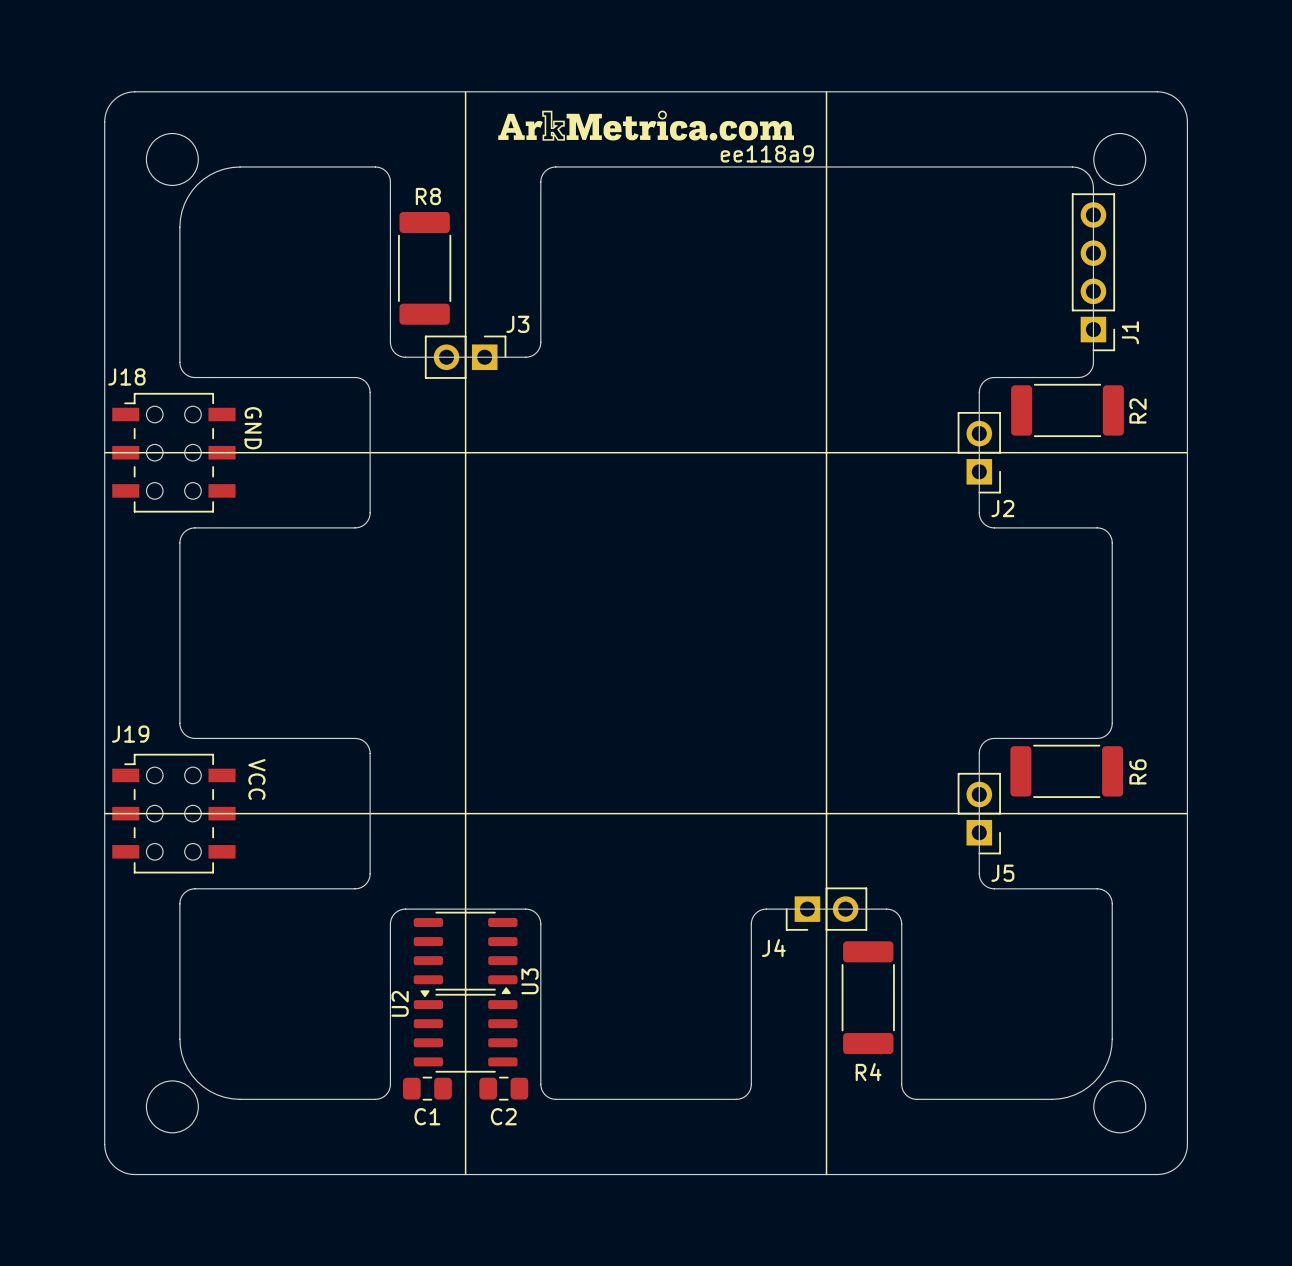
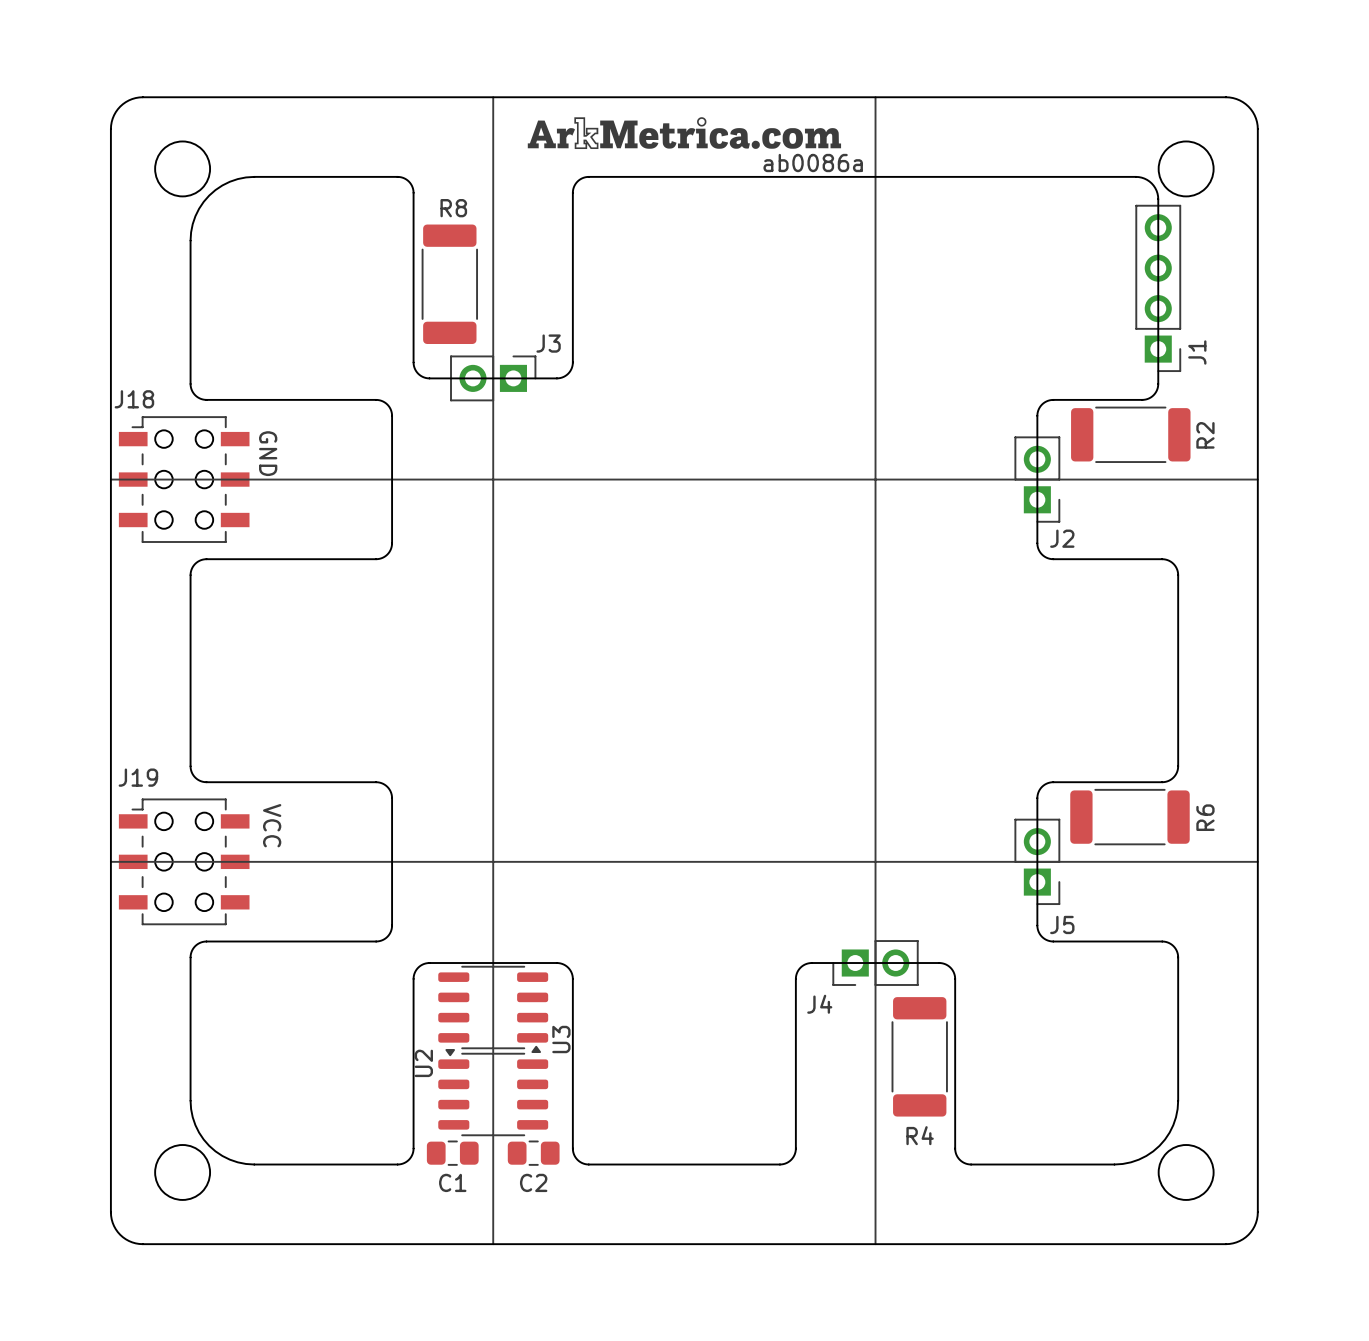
text: ee118a9 (767, 153) -> ab0086a (813, 163)

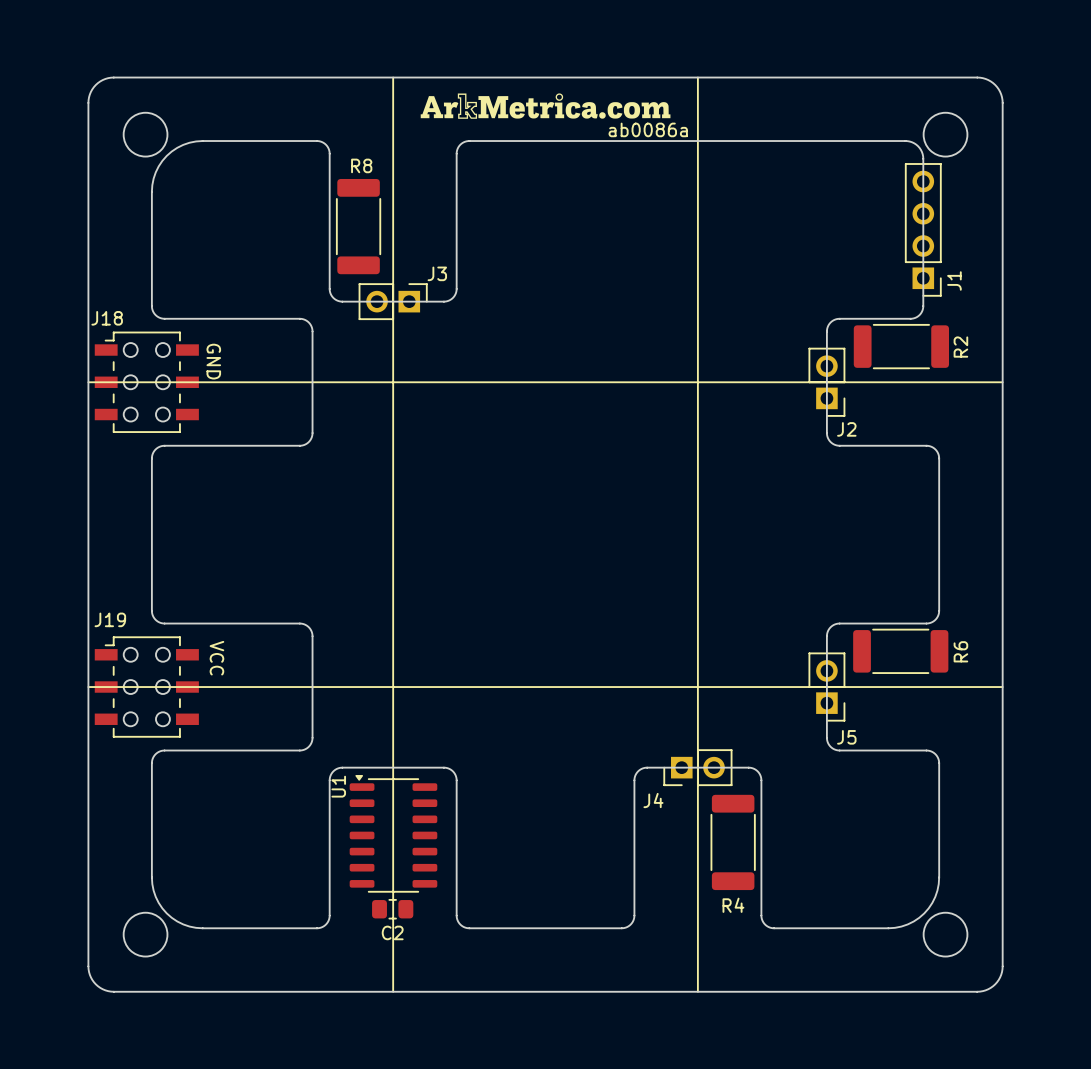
U3: (493, 1009) -> none
U1: none -> (393, 833)
U2: (493, 1092) -> none
C1: (452, 1153) -> none
C2 position: (533, 1153) -> (392, 909)

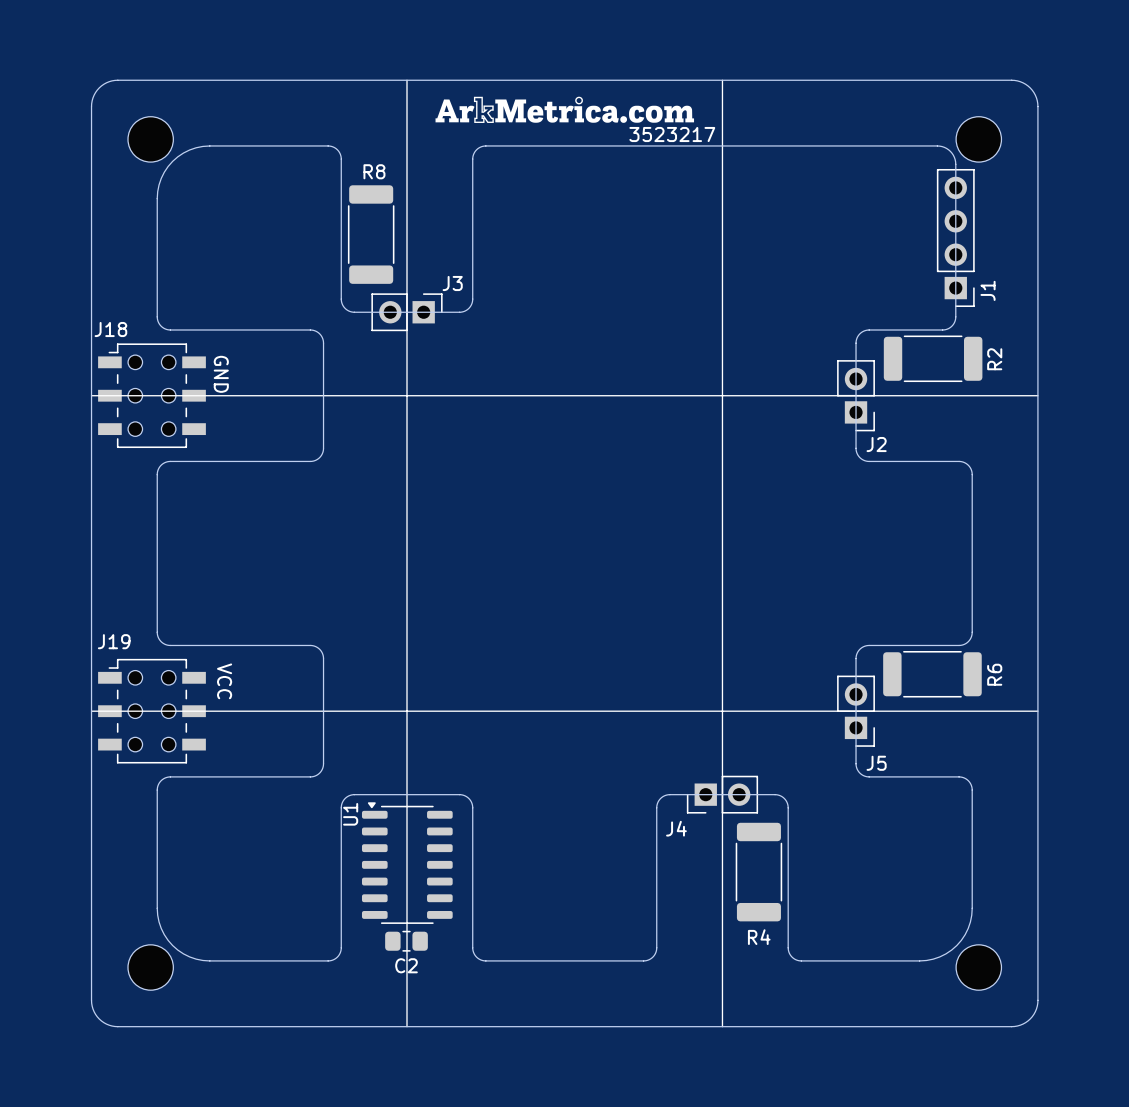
text: ab0086a (648, 129) -> 3523217 (672, 134)

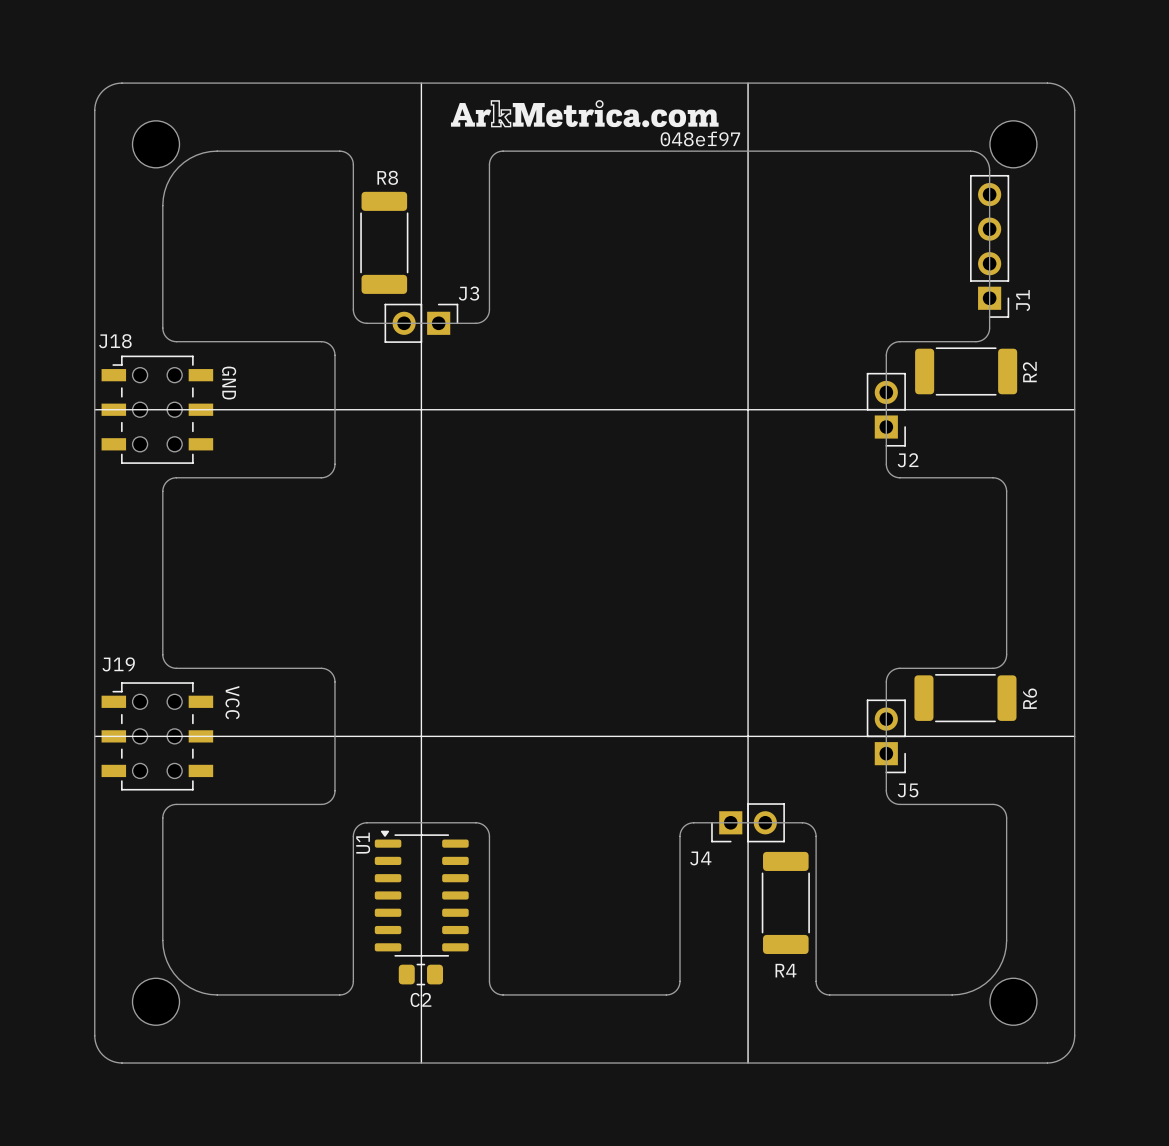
text: 3523217 (672, 134) -> 048ef97 (700, 138)

